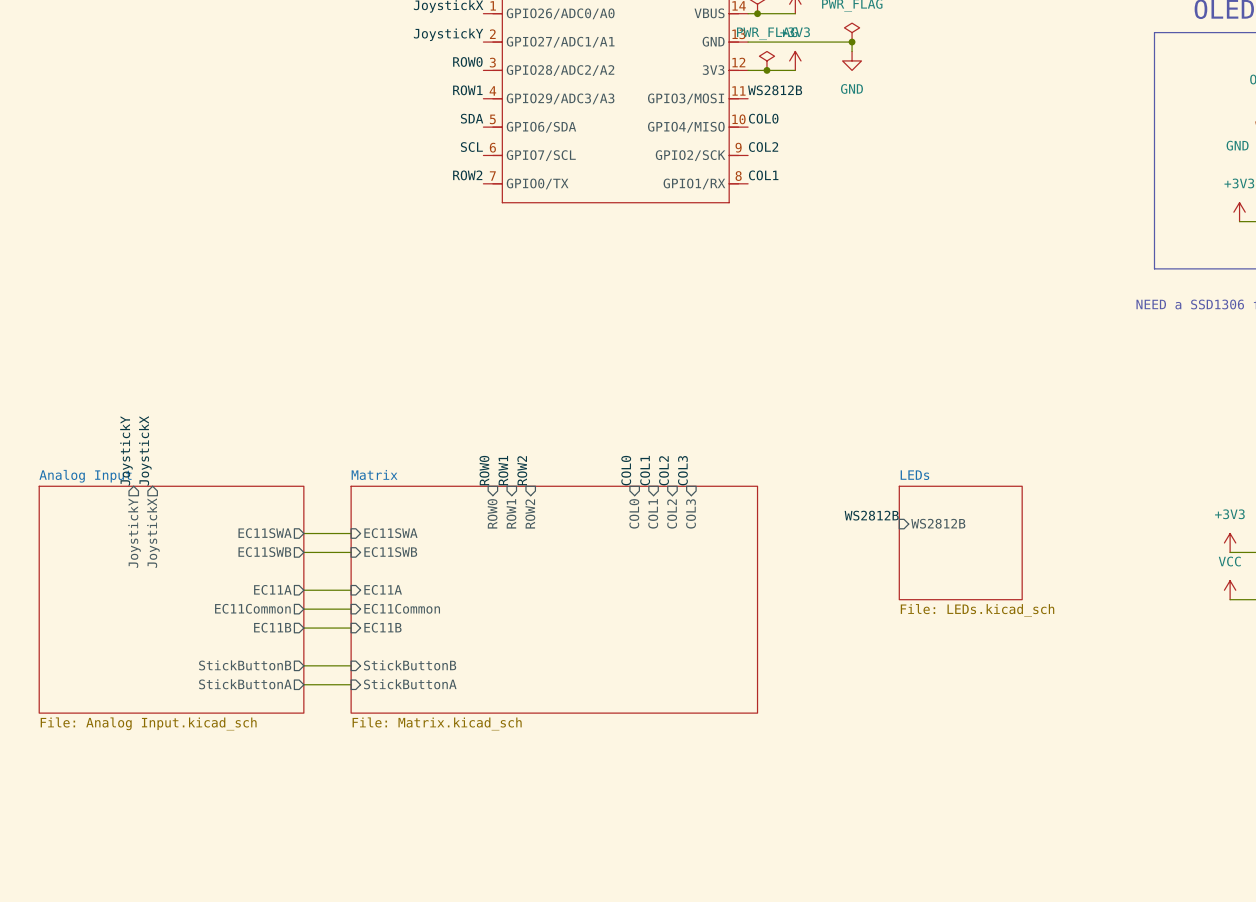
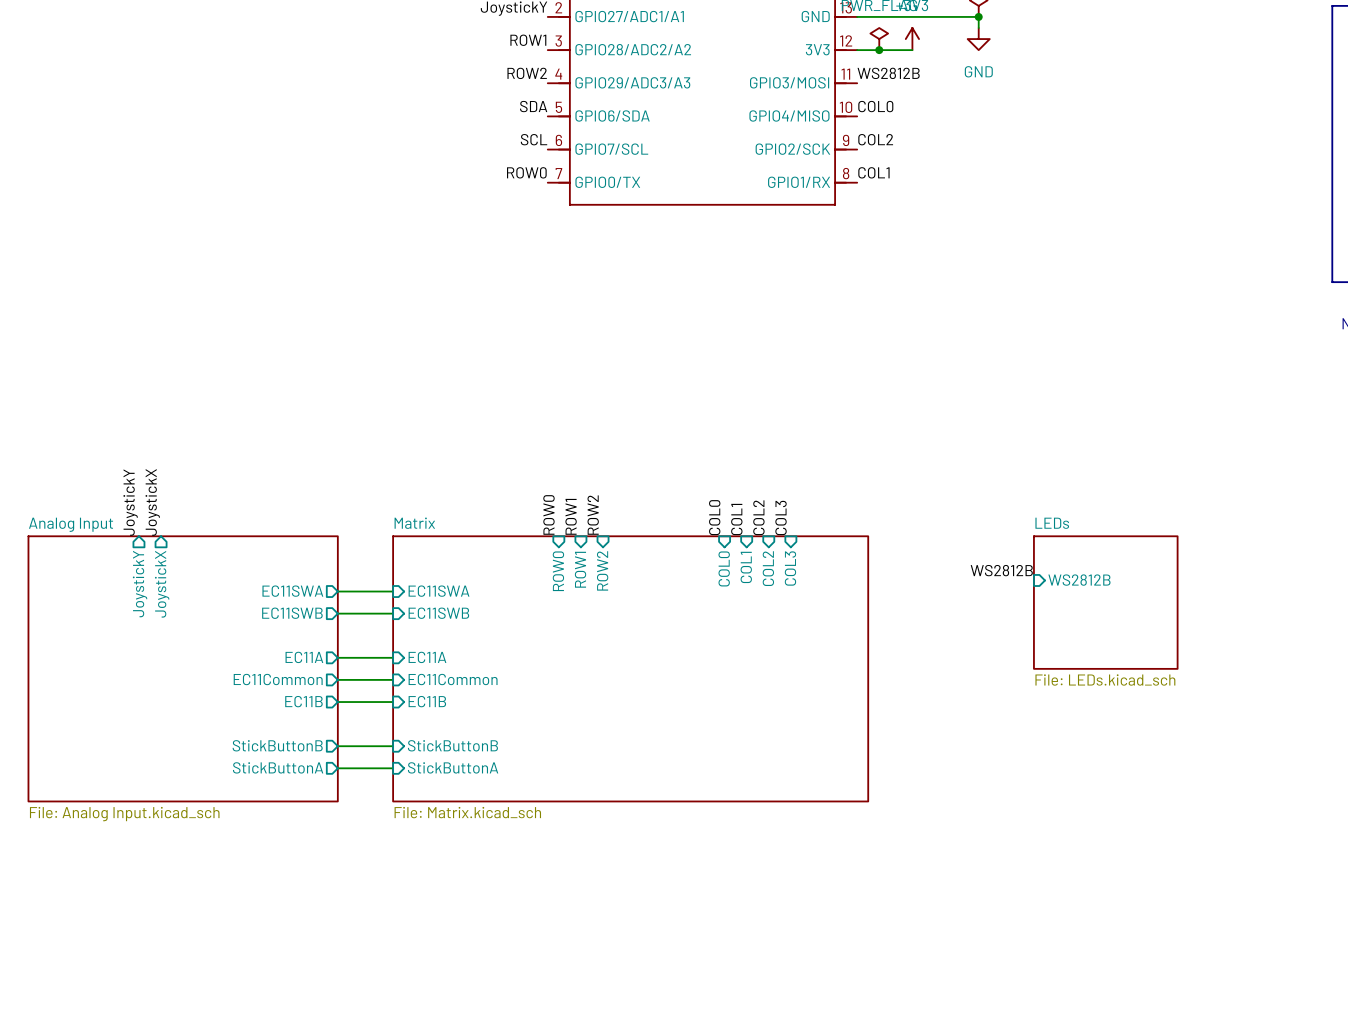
label: ROW0 (467, 61) -> ROW1 (528, 40)
label: ROW1 (467, 90) -> ROW2 (527, 73)
label: ROW2 (467, 175) -> ROW0 (526, 172)

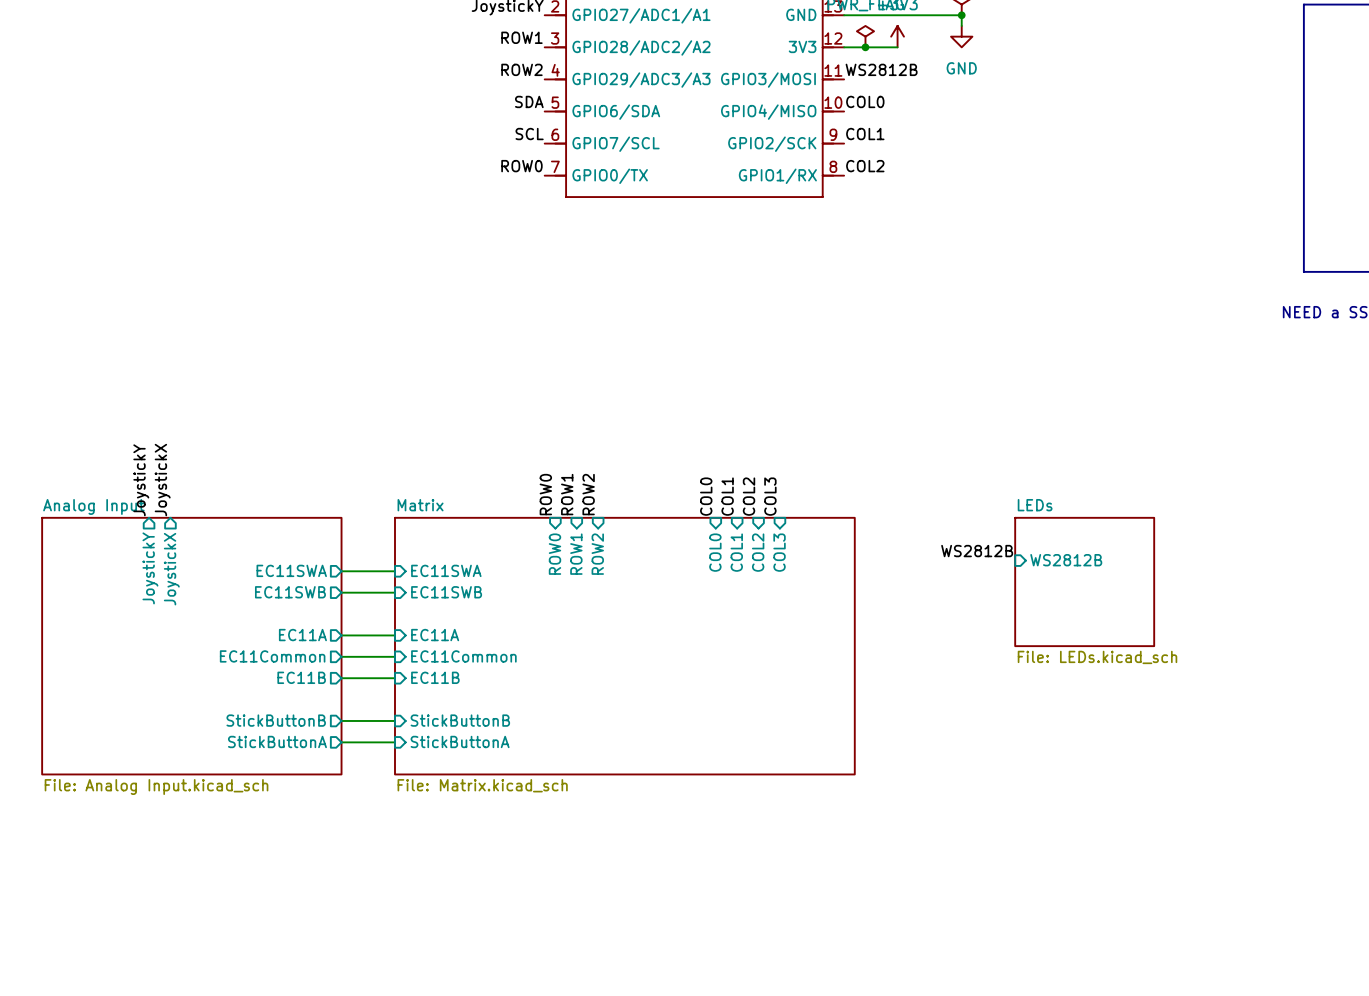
label: COL2 (875, 139) -> COL1 (865, 134)
label: COL1 (873, 172) -> COL2 (865, 166)

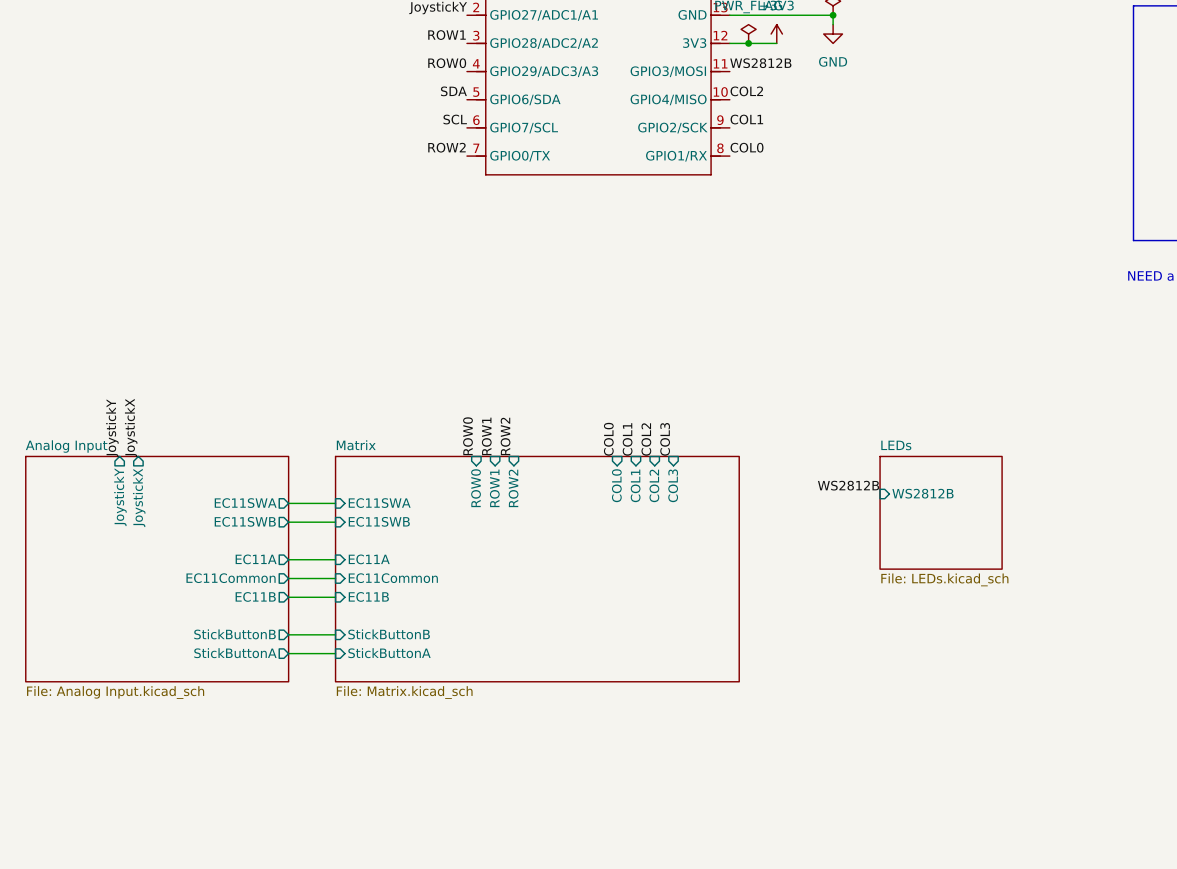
label: ROW2 (521, 69) -> ROW0 (447, 63)
label: COL0 (865, 101) -> COL2 (746, 91)
label: ROW0 (521, 166) -> ROW2 (446, 147)
label: COL2 (865, 166) -> COL0 (747, 147)

